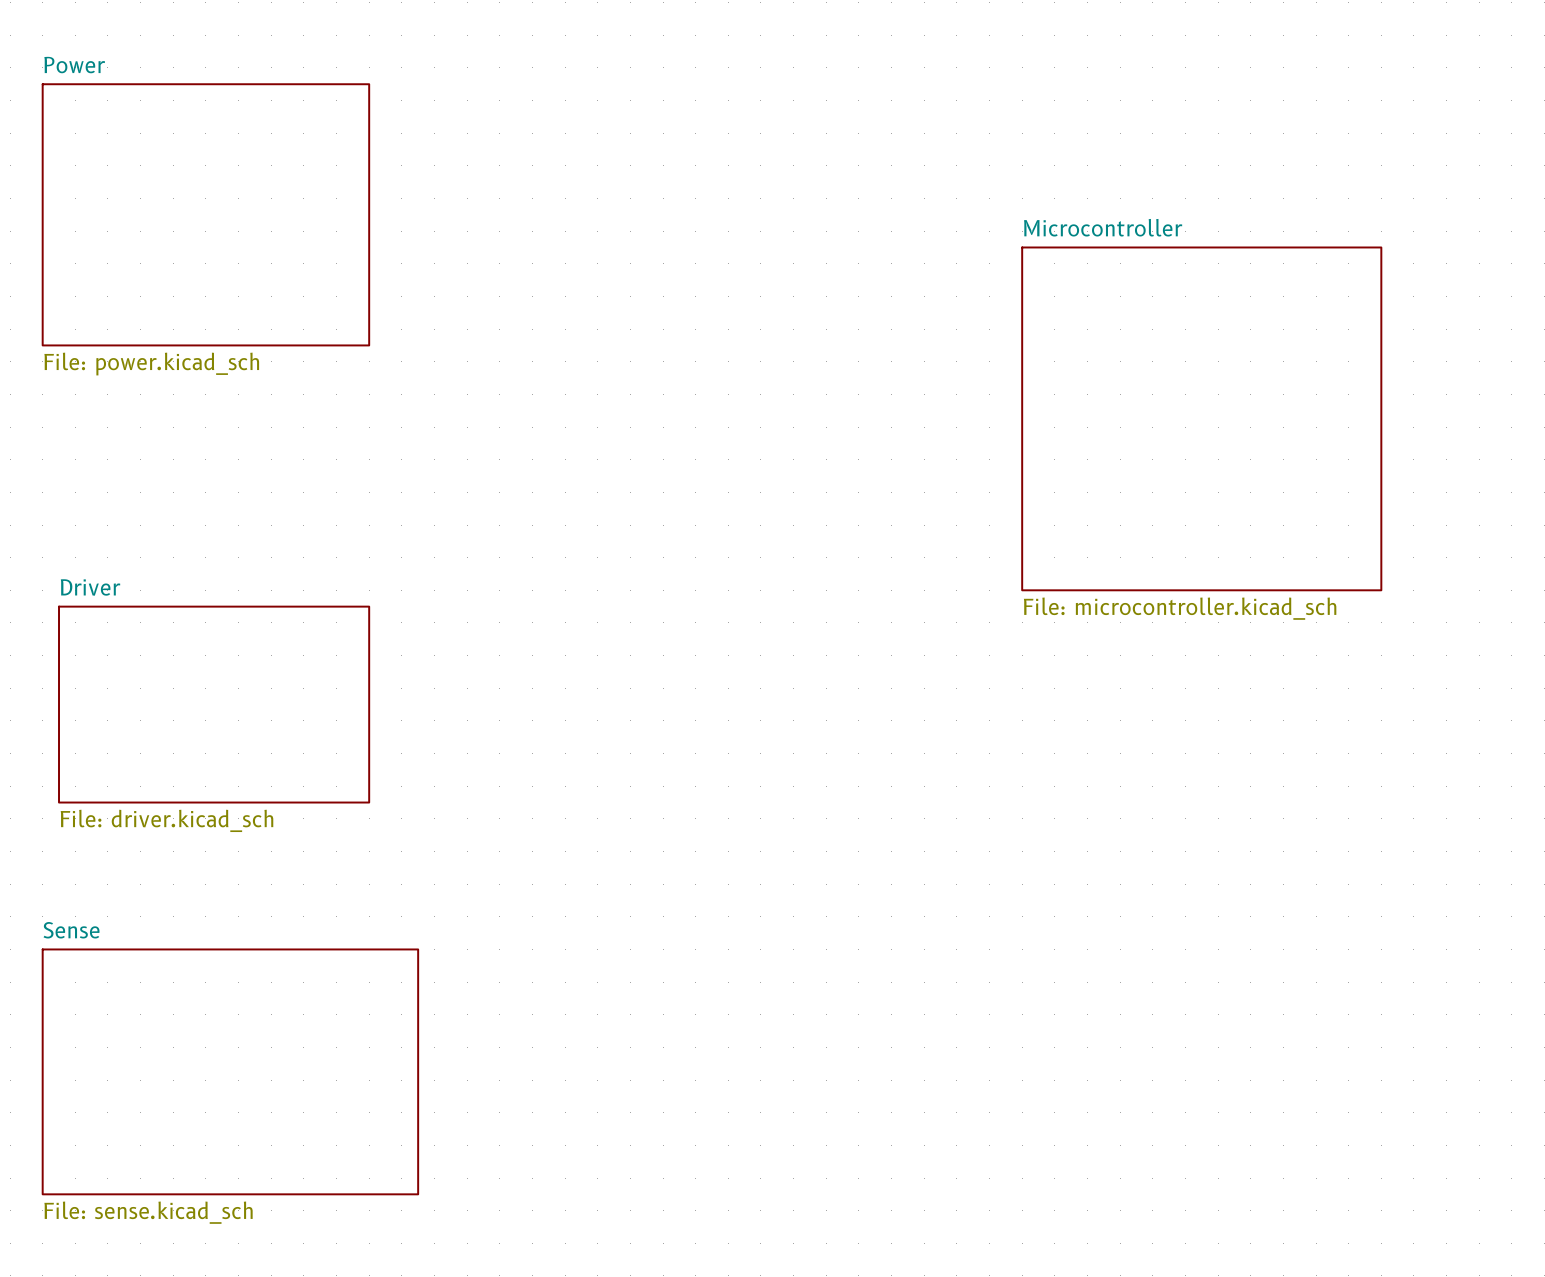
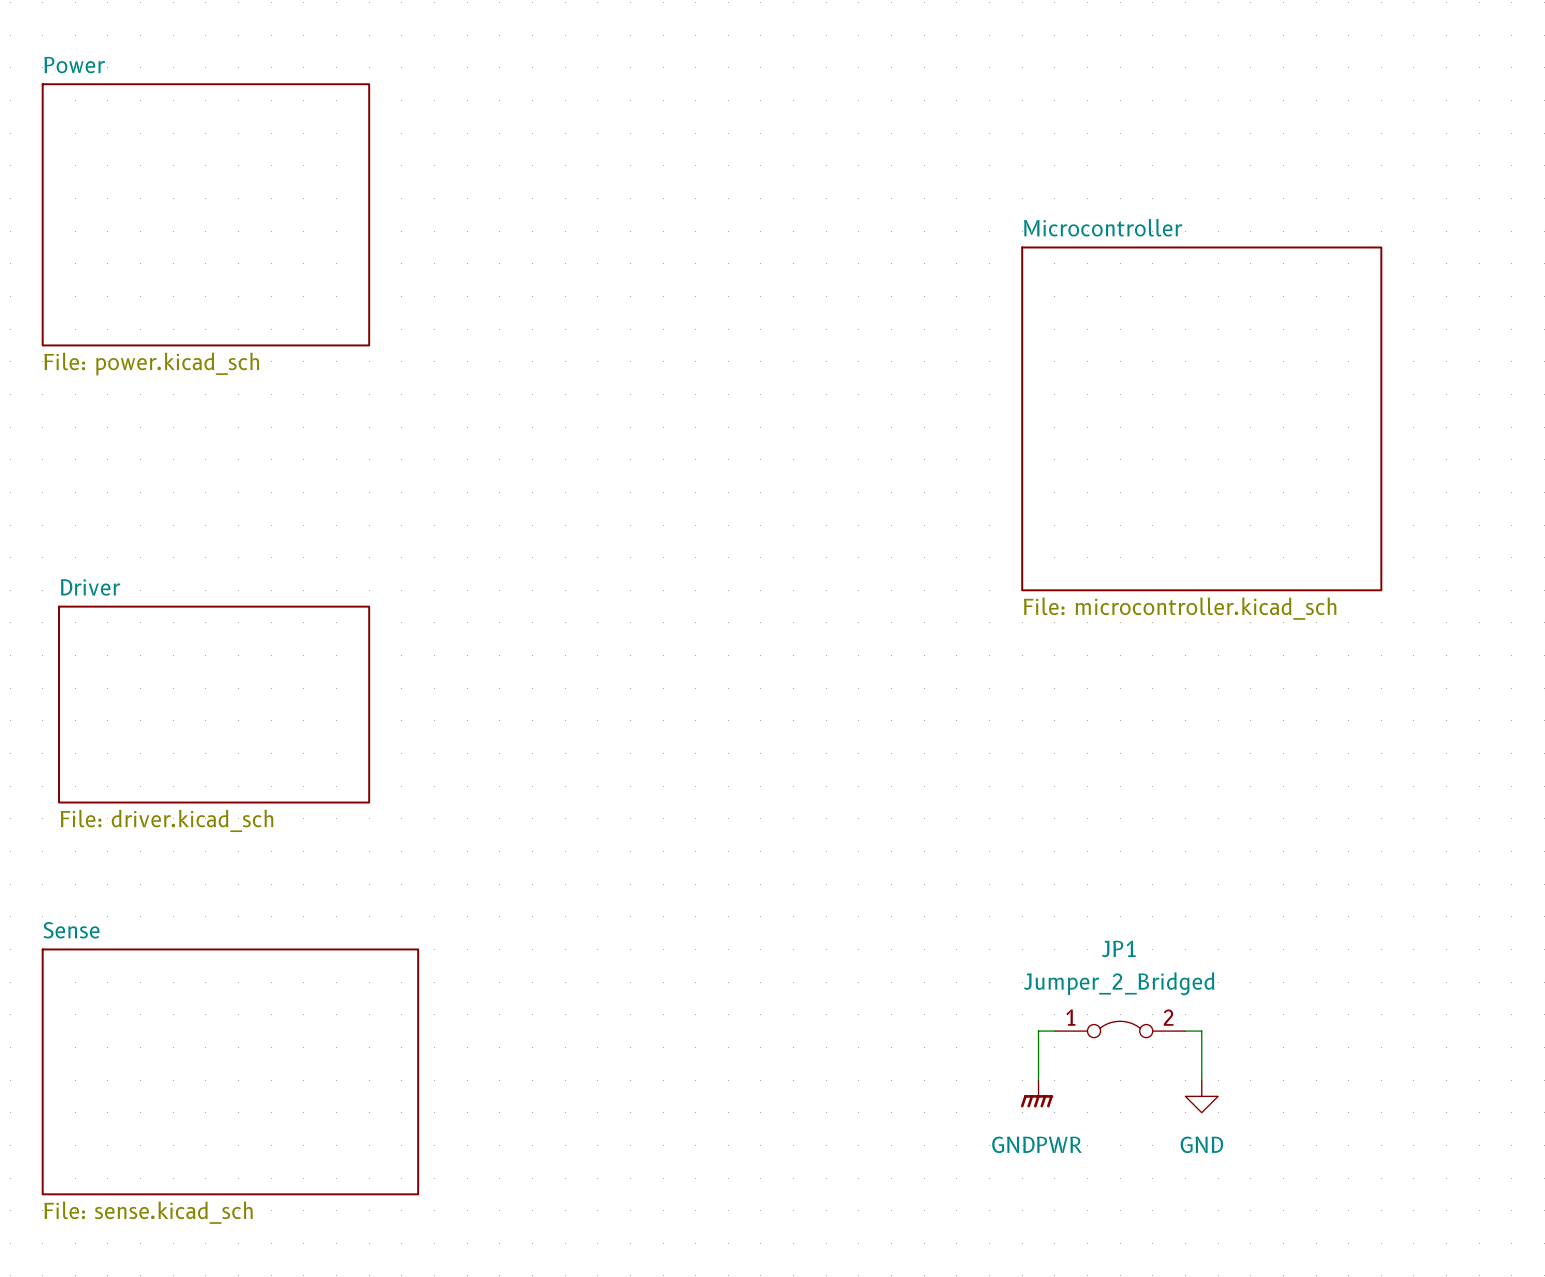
JP1: none -> Jumper_2_Bridged (1120, 1029)
wire: none -> (1054, 1031) (1038, 1031) (1038, 1080)
wire: none -> (1185, 1031) (1201, 1031) (1201, 1080)
power symbol: none -> GNDPWR (1036, 1093)
power symbol: none -> GND (1201, 1096)

